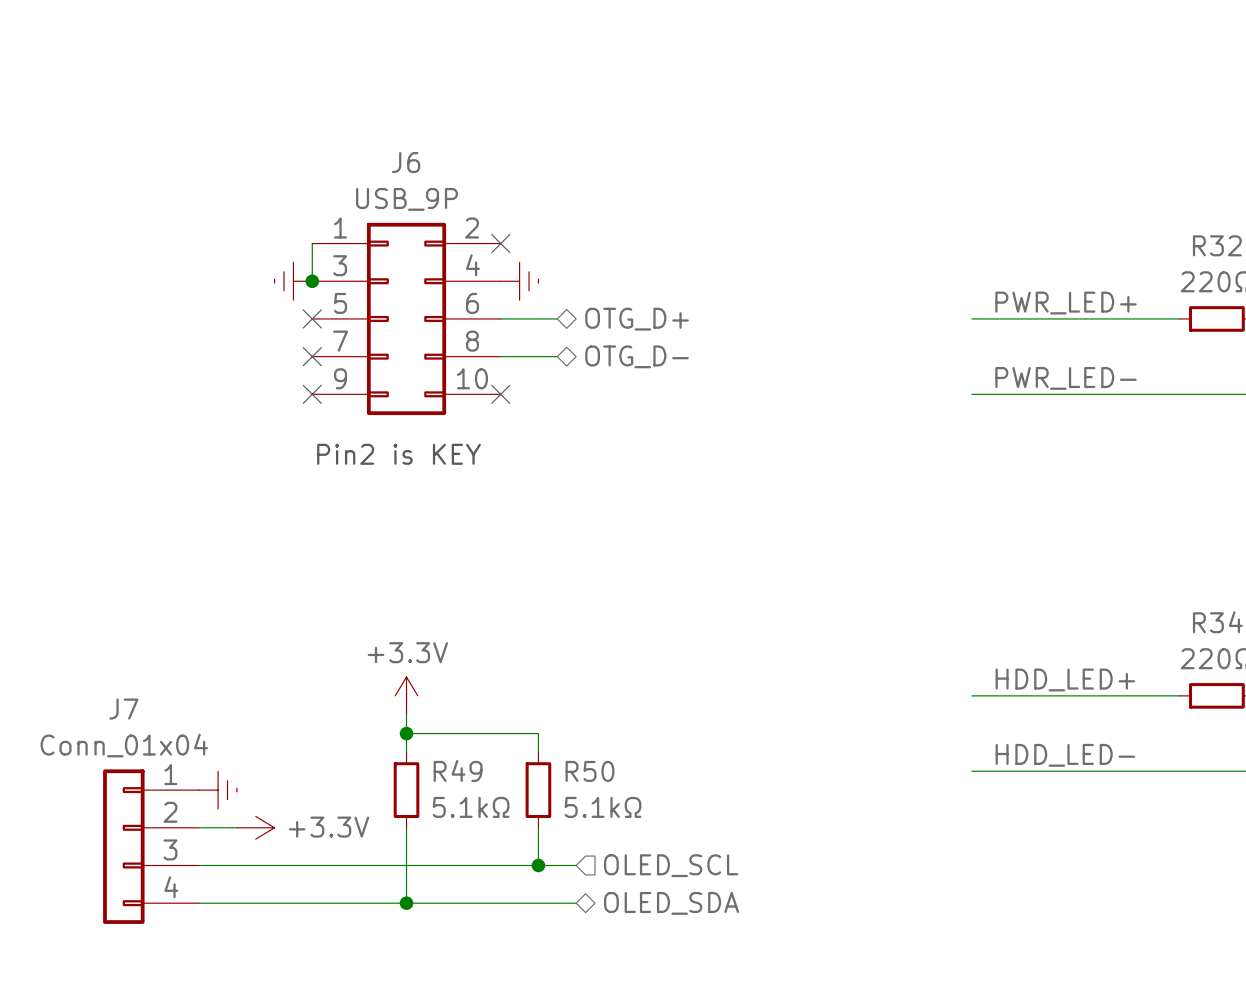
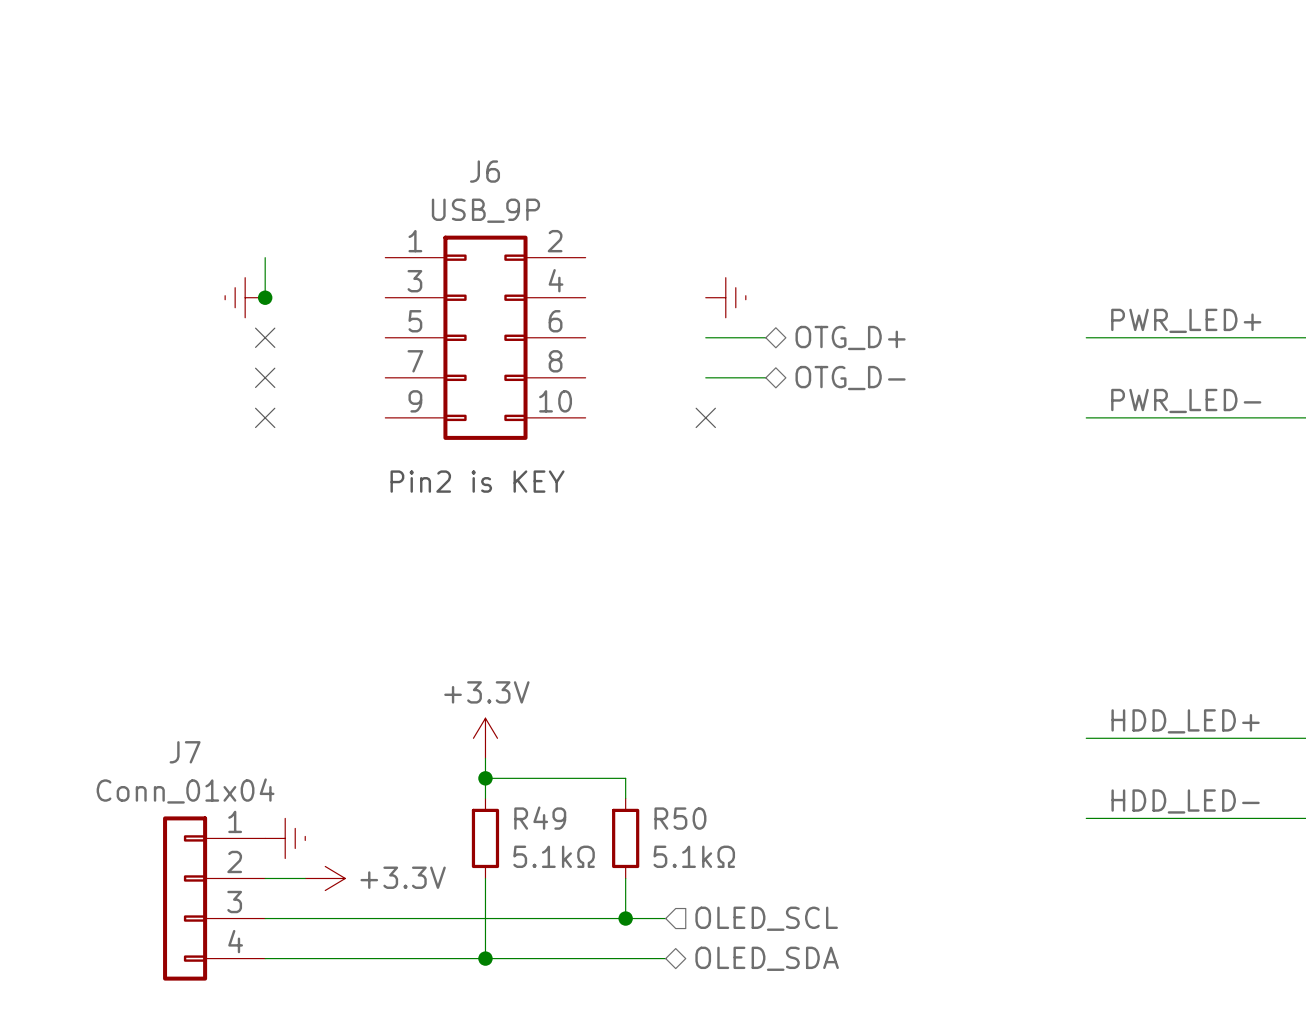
wire: (312, 243) (312, 281) -> (265, 257) (265, 297)
no-connect mark: (500, 243) -> none
junction: none -> (265, 297)
power symbol position: (293, 281) -> (245, 297)
junction: (312, 281) -> none
power symbol position: (519, 281) -> (725, 297)
no-connect mark: none -> (265, 337)
no-connect mark: (312, 318) -> none
wire: (500, 318) (557, 318) -> (705, 337) (765, 337)
hierarchical label position: OTG_D+ (637, 319) -> OTG_D+ (850, 337)
no-connect mark: none -> (265, 377)
no-connect mark: (312, 356) -> none
wire: (500, 356) (557, 356) -> (705, 377) (765, 377)
hierarchical label position: OTG_D- (637, 356) -> OTG_D- (850, 378)
no-connect mark: none -> (265, 417)
no-connect mark: (312, 394) -> none
no-connect mark: (500, 394) -> none
no-connect mark: none -> (705, 417)

